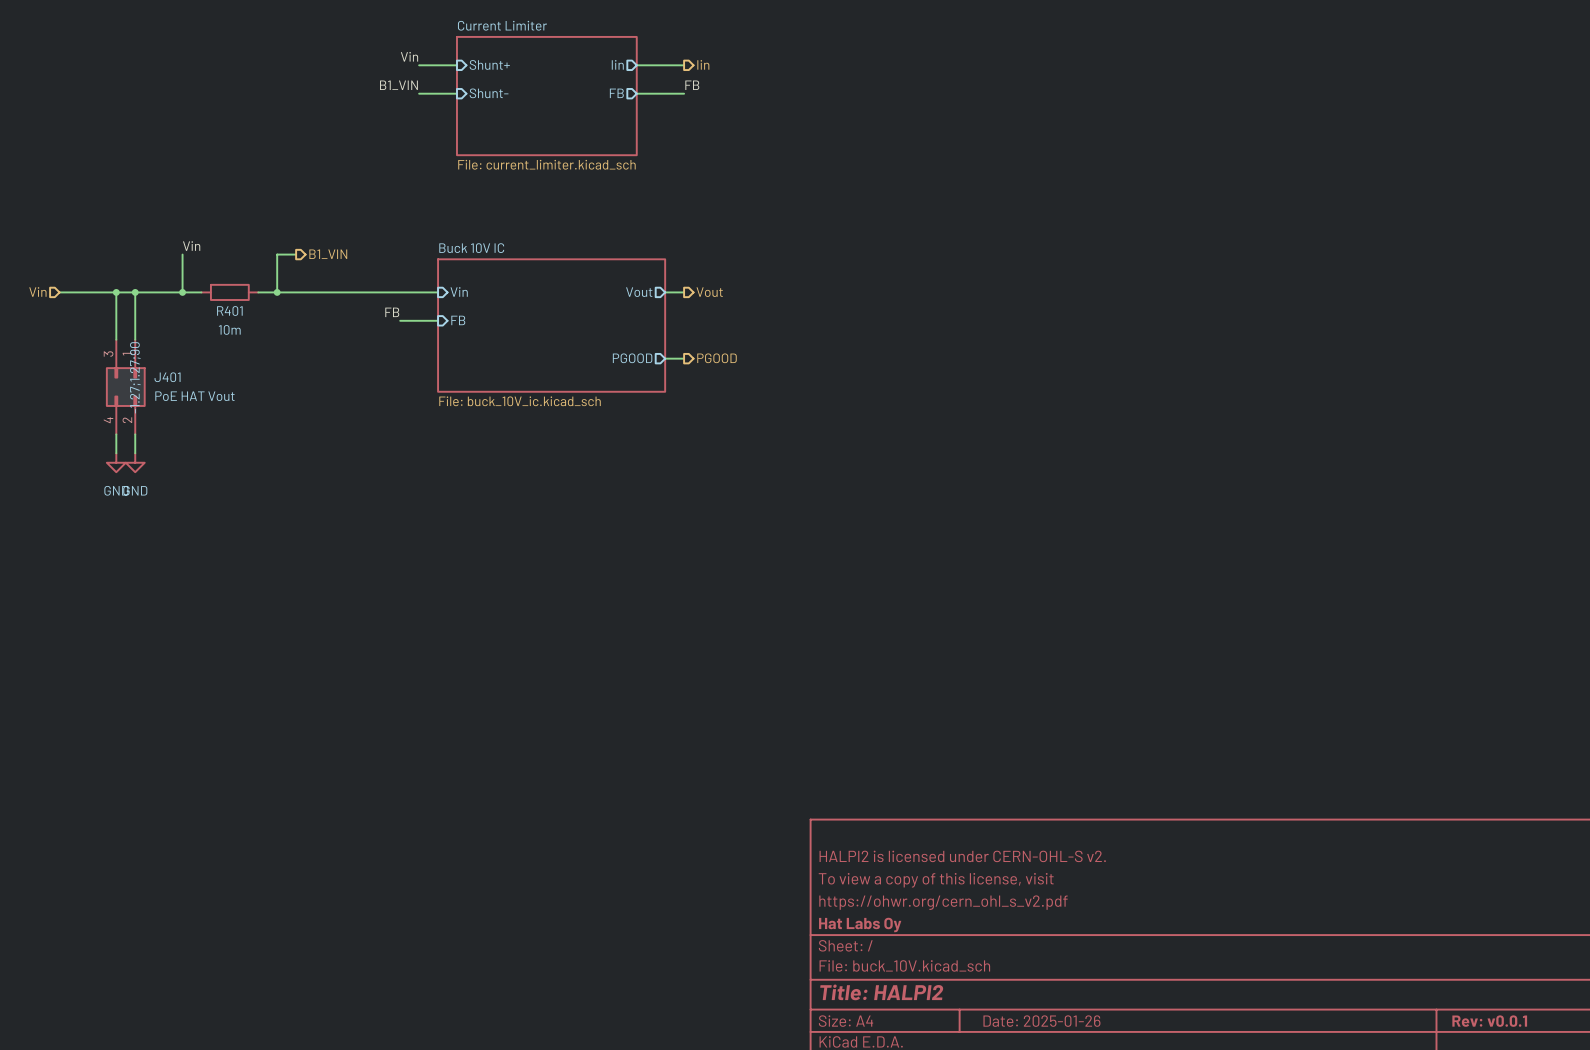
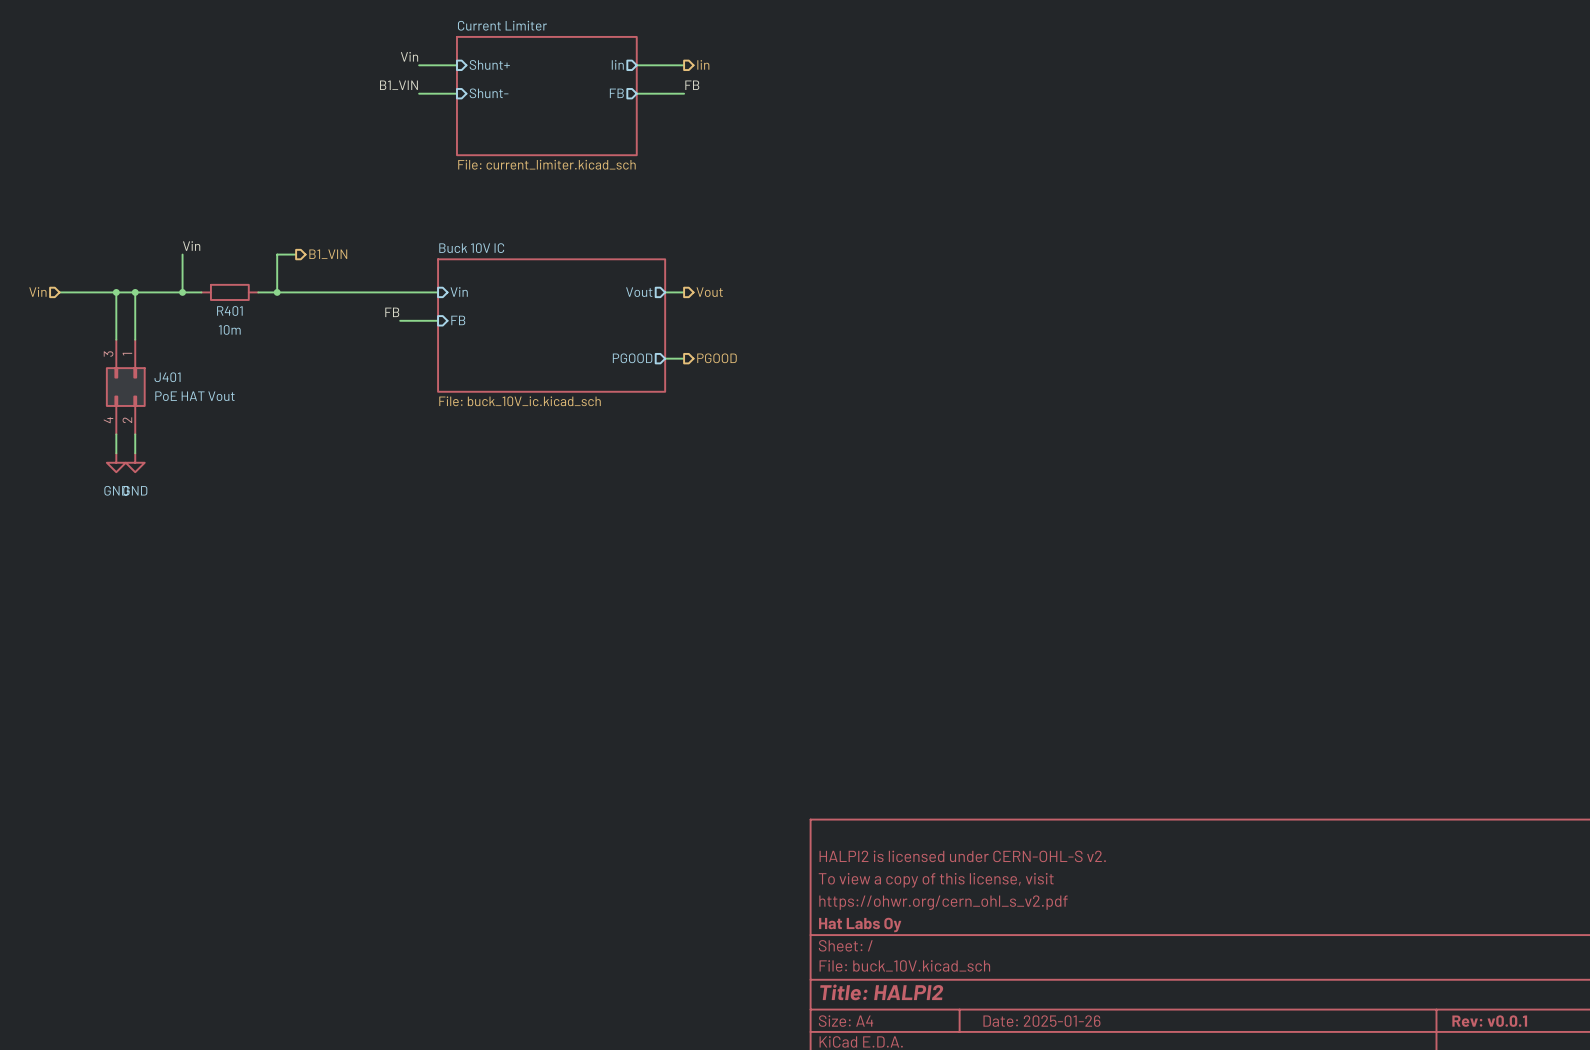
J401 text: -1.27;1.27;90 (135, 377) -> none

